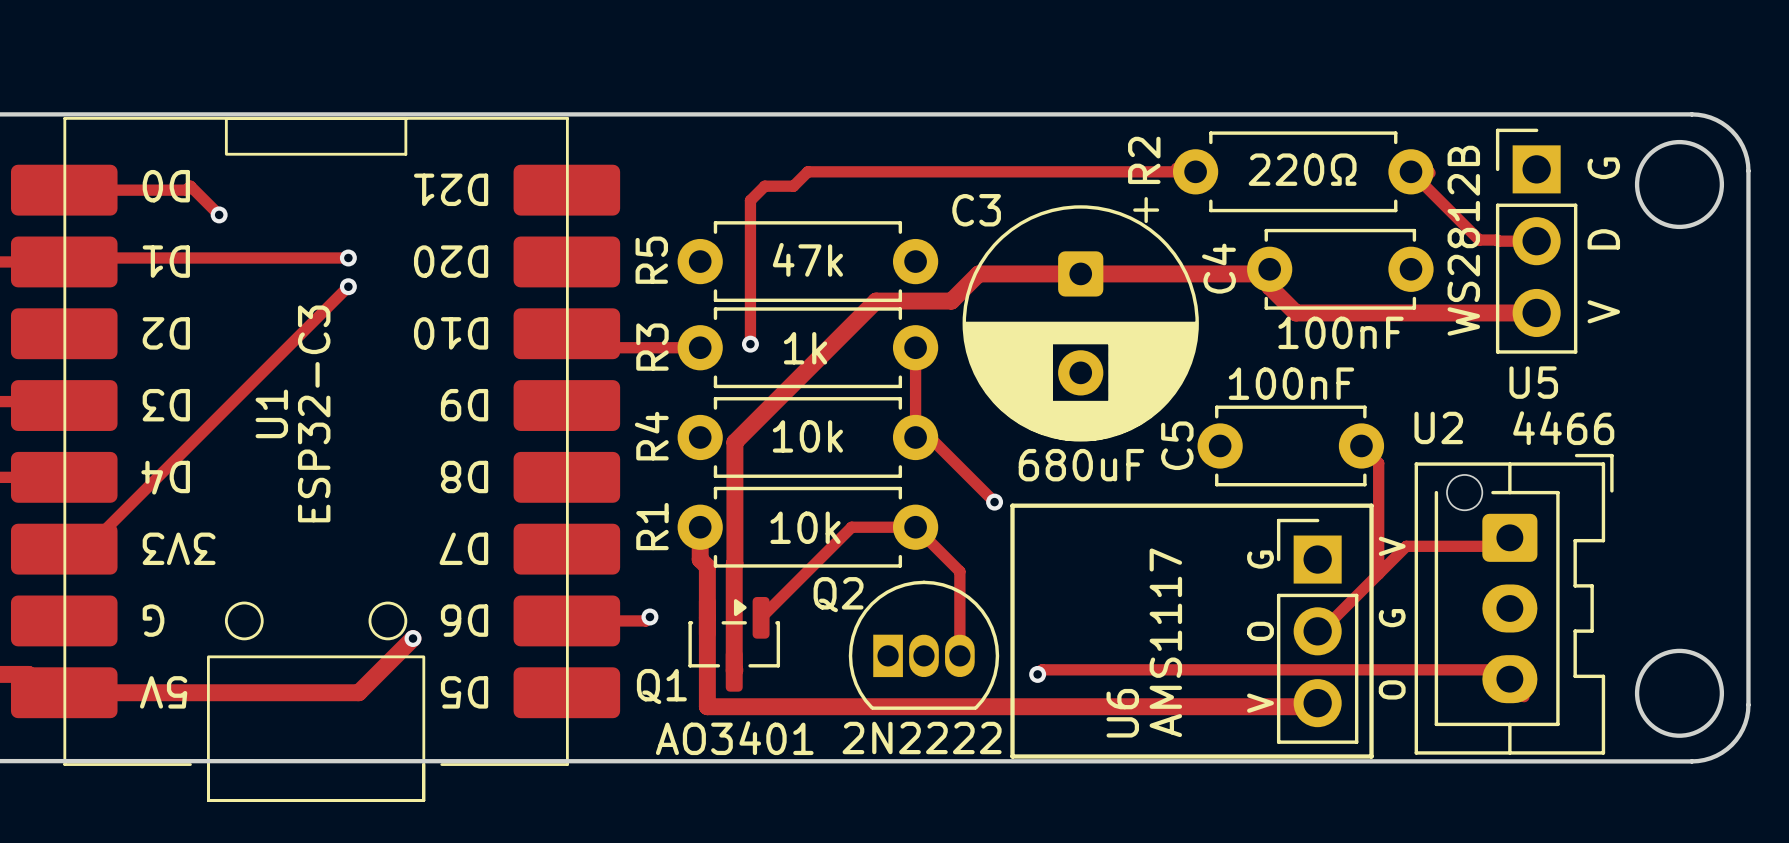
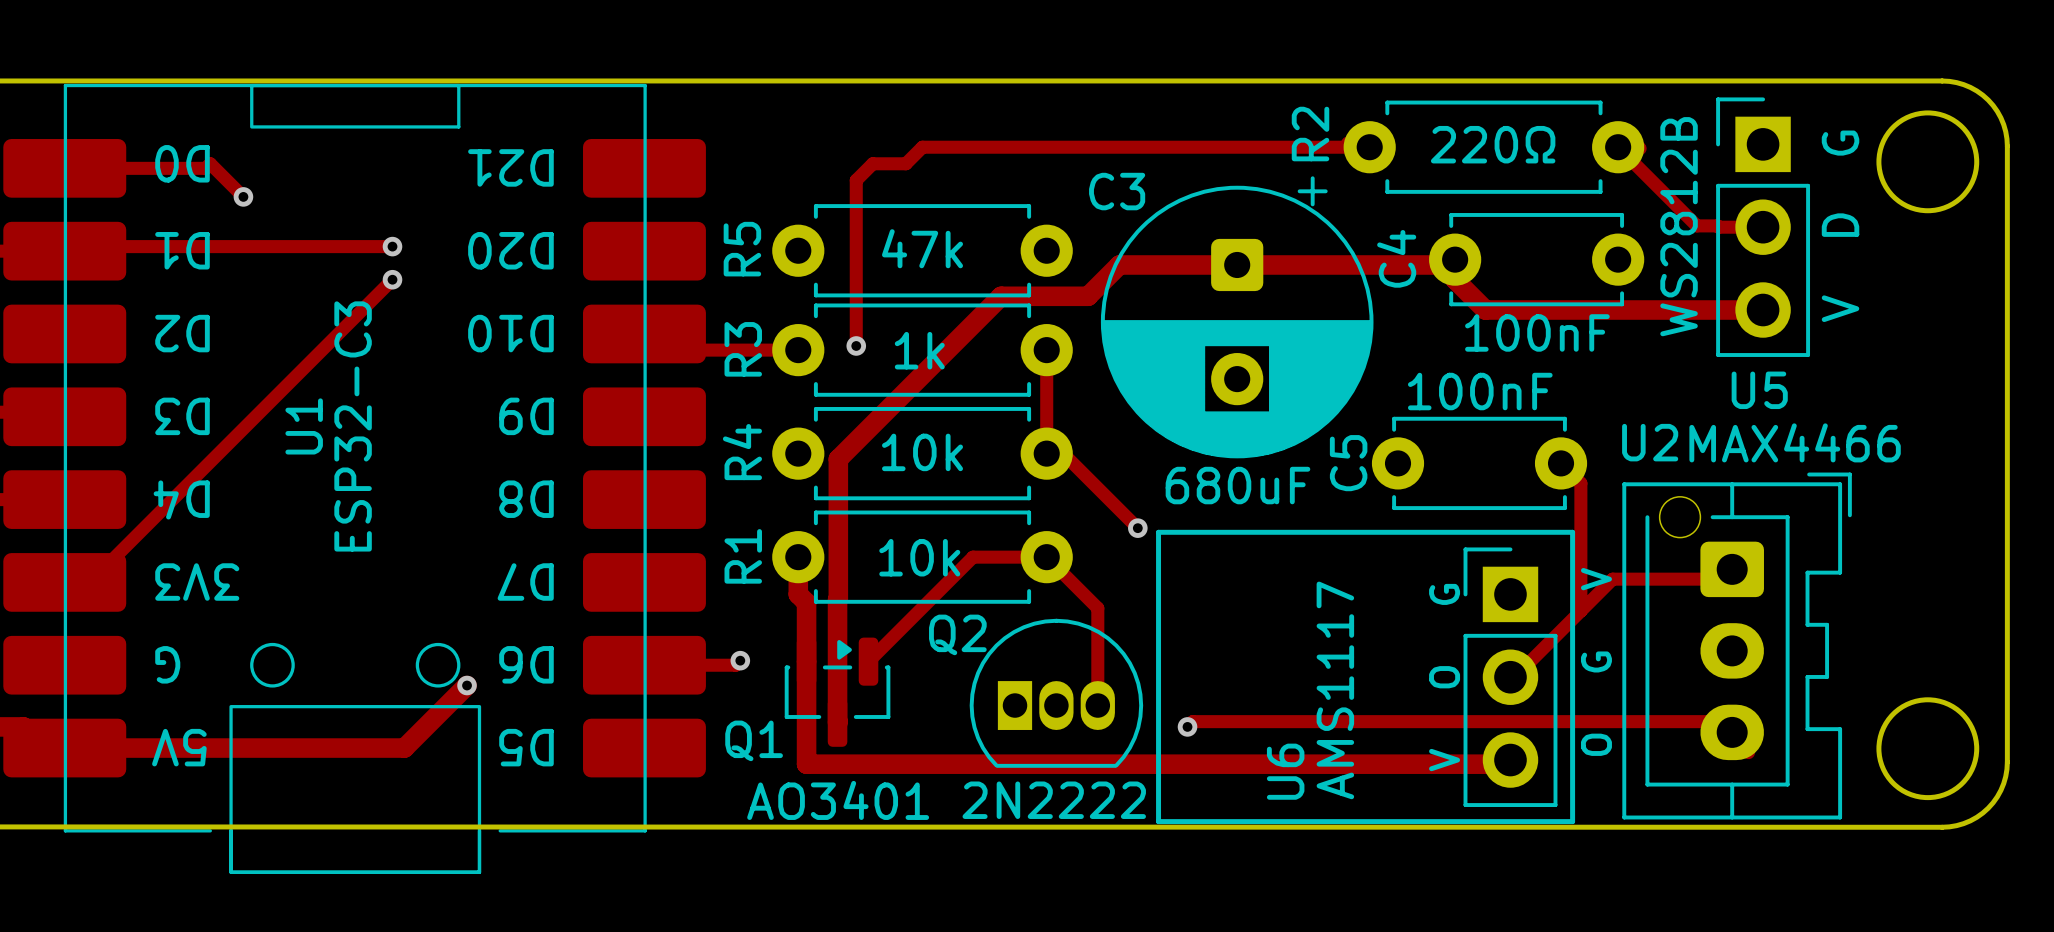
U2 value: 4466 (1563, 428) -> MAX4466 (1795, 442)

